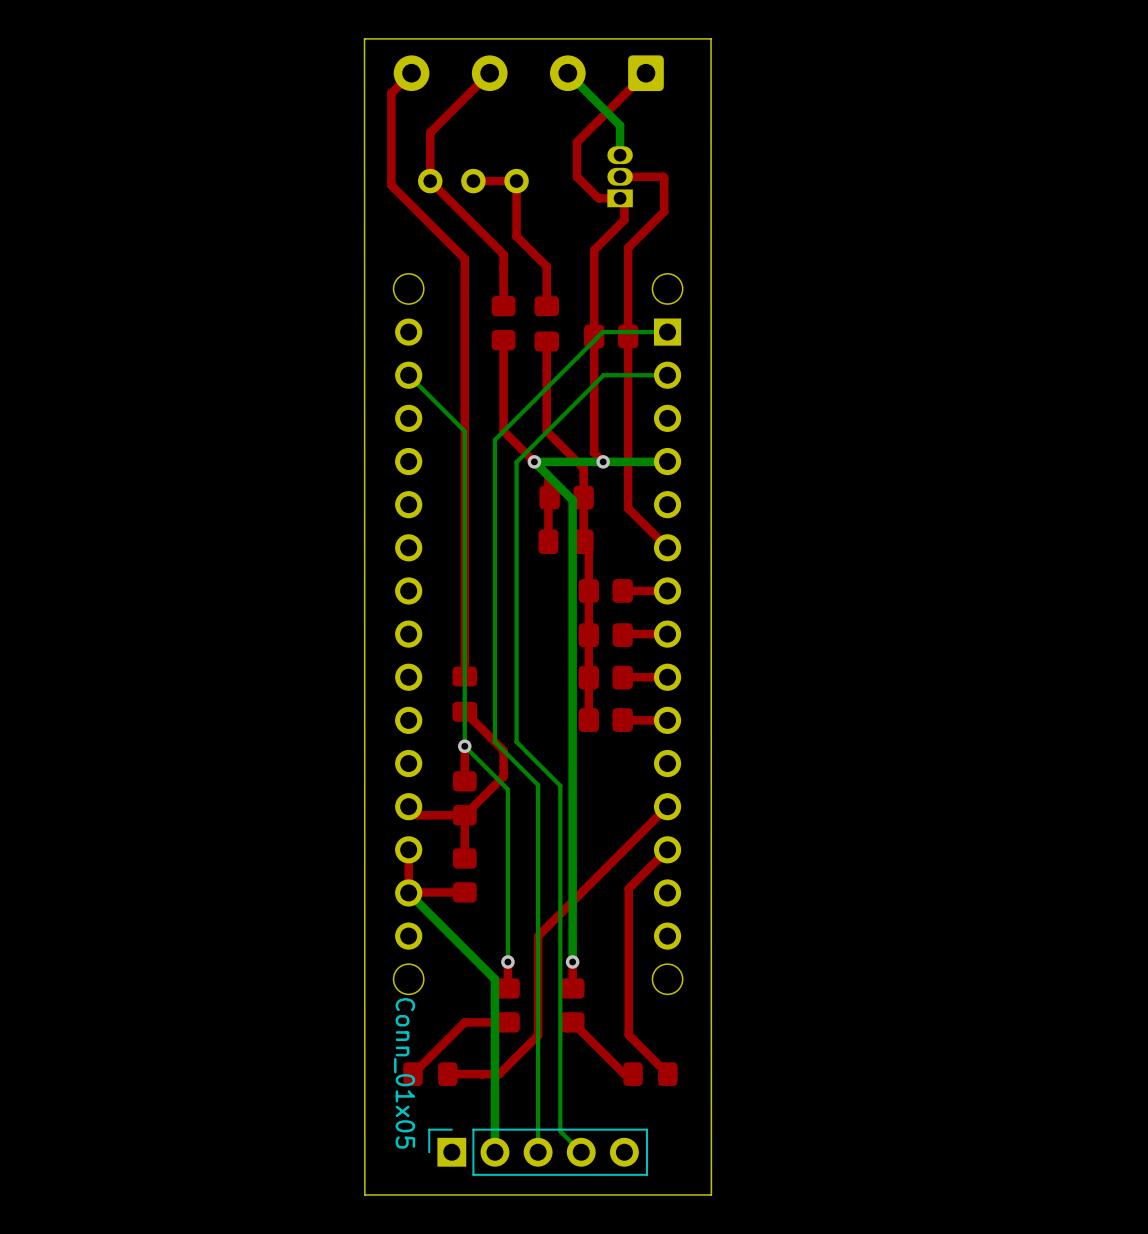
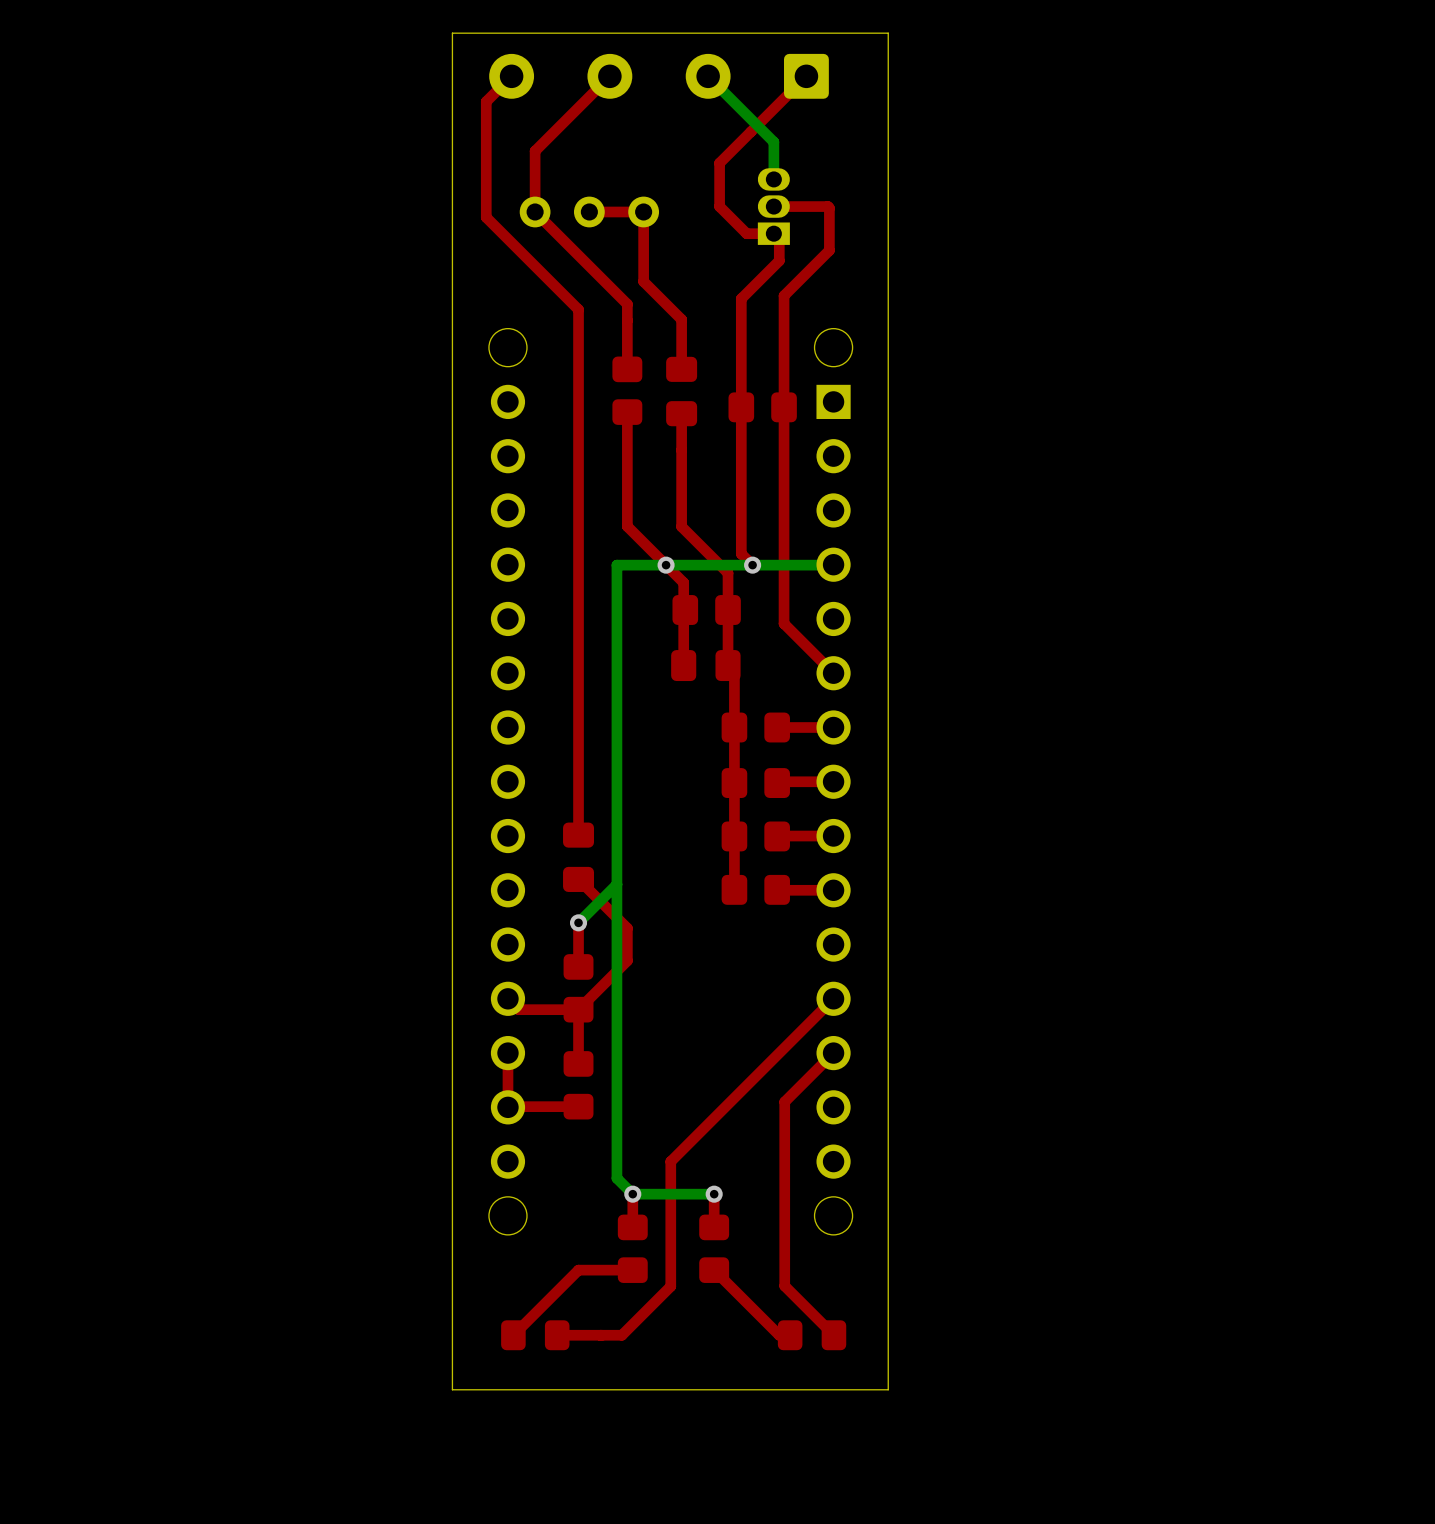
board edge: (711, 38) (711, 1194) (364, 1194) (364, 38) -> (888, 33) (888, 1389) (452, 1389) (452, 33)
bottom track: (667, 332) (602, 332) (494, 439) (494, 741) (538, 785) (538, 1152) -> none
bottom track: (408, 375) (464, 431) (464, 746) (507, 789) (507, 961) -> none
bottom track: (667, 375) (603, 375) (516, 462) (516, 741) (560, 785) (560, 1131) (581, 1152) -> none
bottom track: (534, 461) (572, 500) (572, 961) -> (666, 565) (616, 565) (616, 1178) (632, 1194) (714, 1194)
bottom track: none -> (616, 884) (578, 922)
bottom track: (408, 892) (494, 979) (494, 1152) -> none
Conn_01x05: (538, 1152) -> none

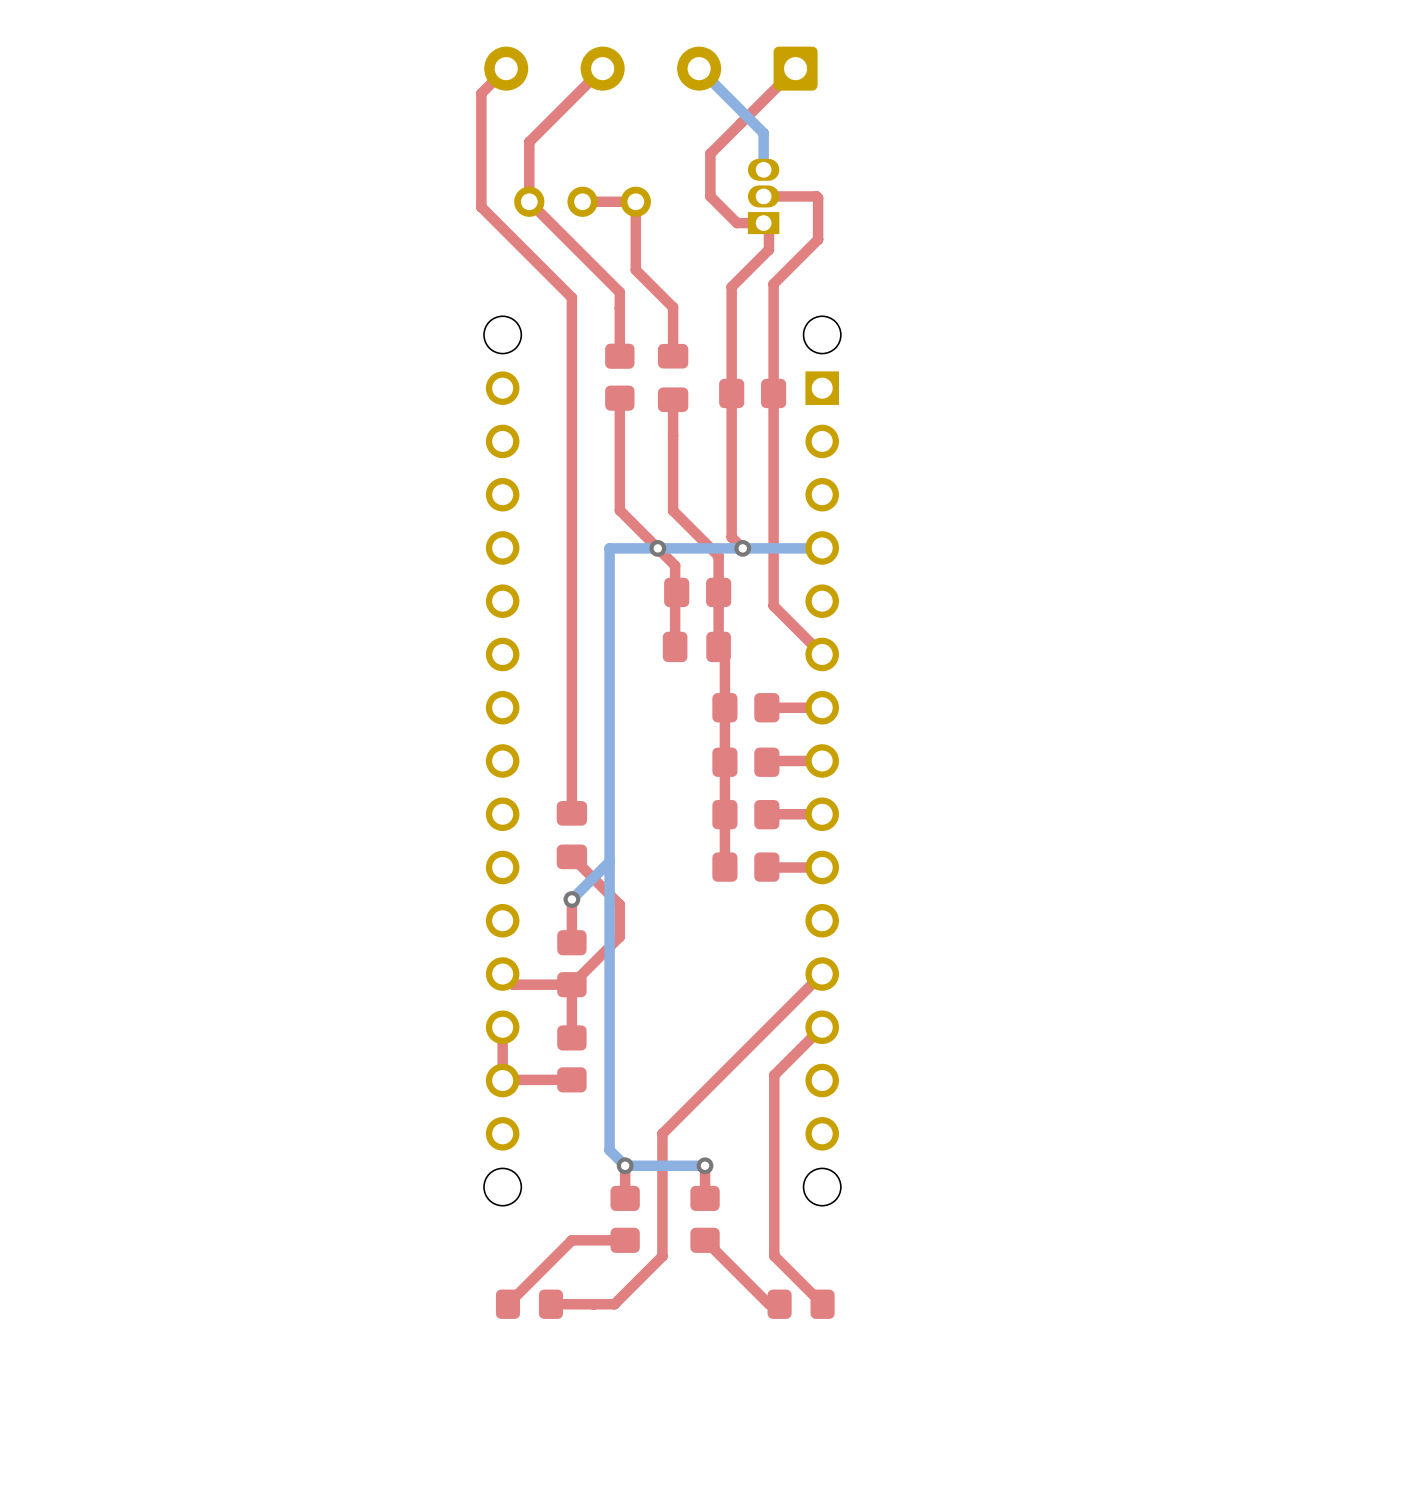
board edge: (888, 33) (888, 1389) (452, 1389) (452, 33) (888, 33) -> none

